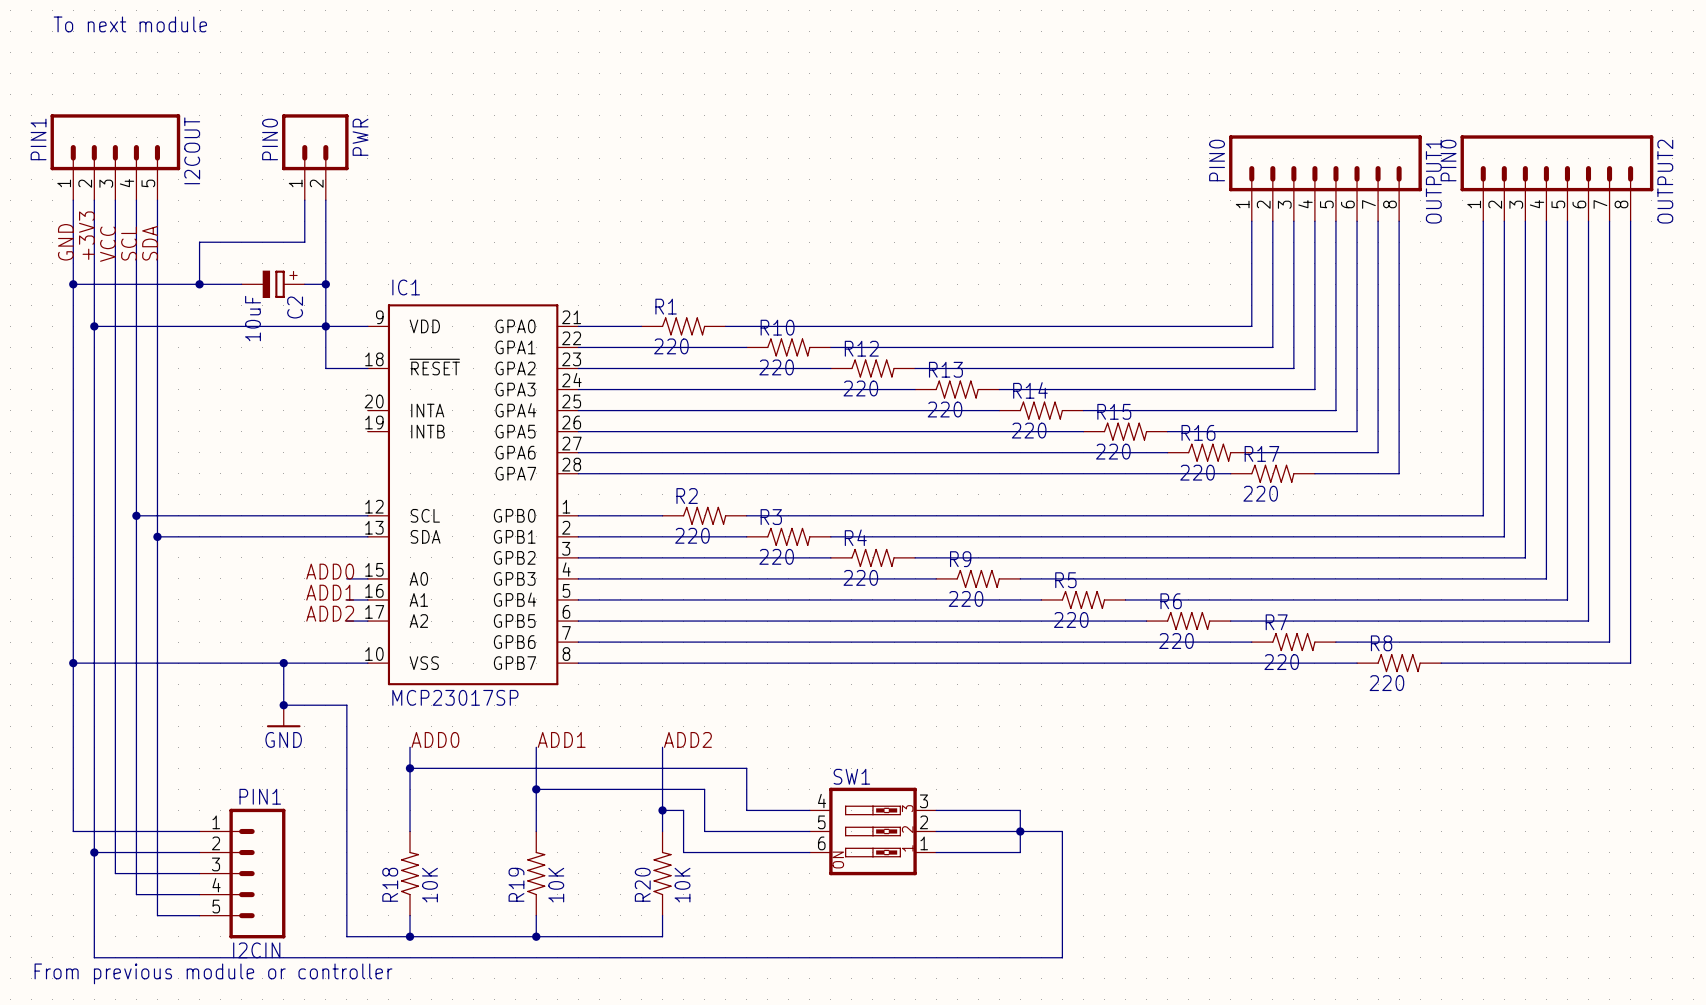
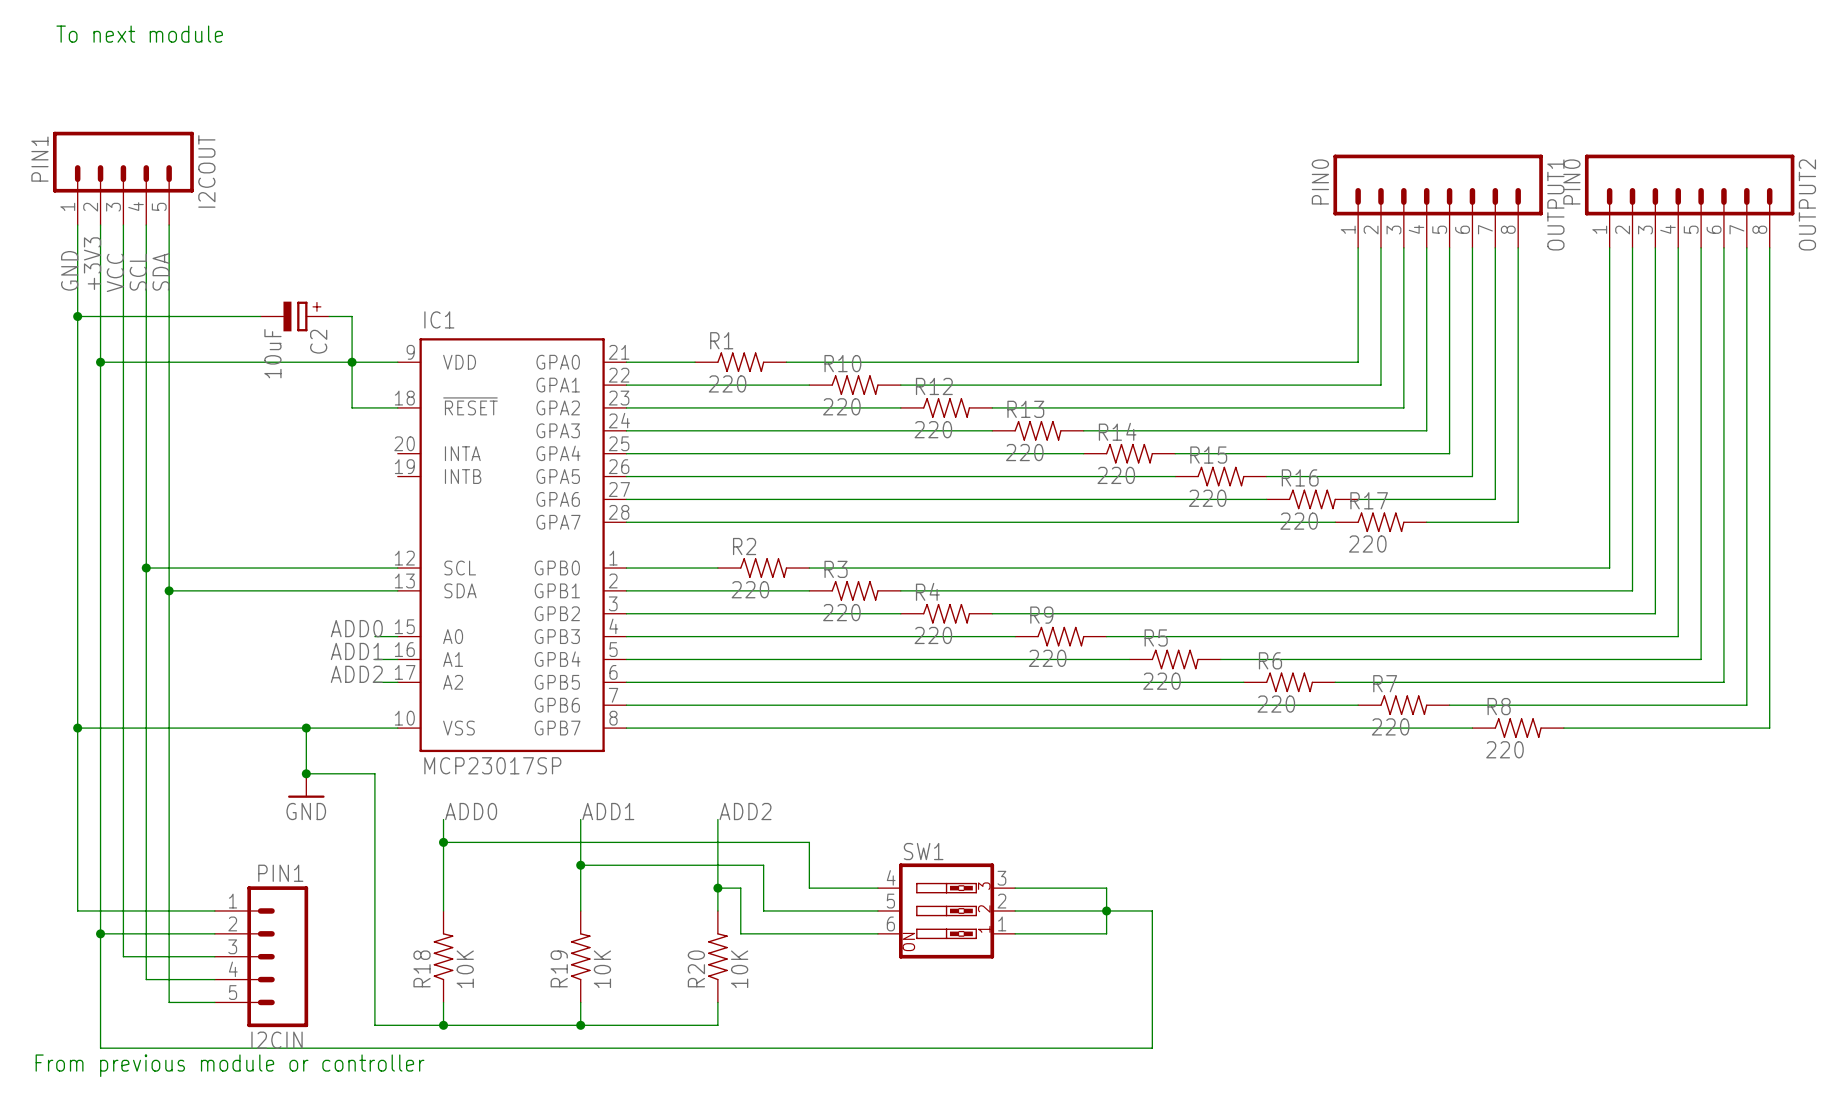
PWR: PIN0 (315, 157) -> none
wire: (304, 200) (304, 242) (199, 242) (199, 284) -> none
wire: (325, 200) (325, 284) -> none
junction: (199, 284) -> none
junction: (325, 284) -> none

